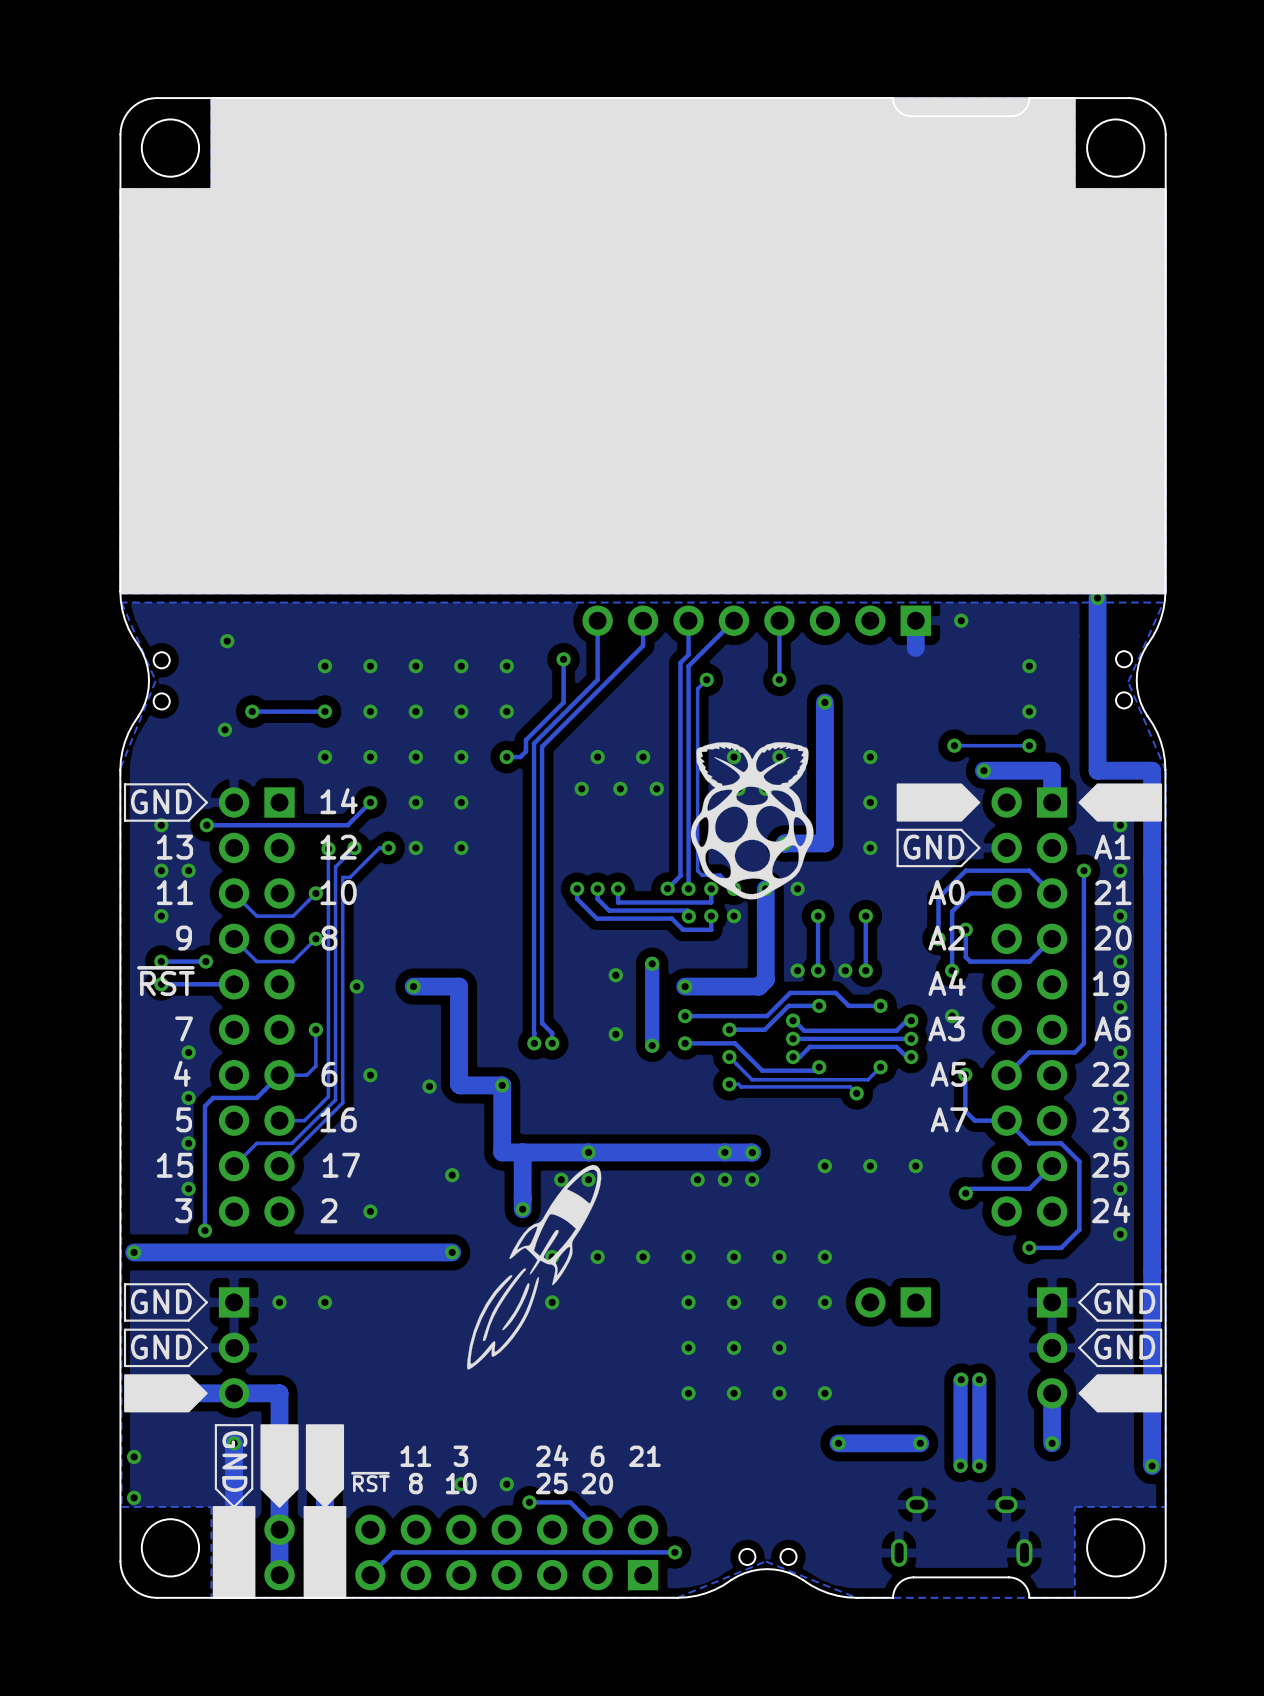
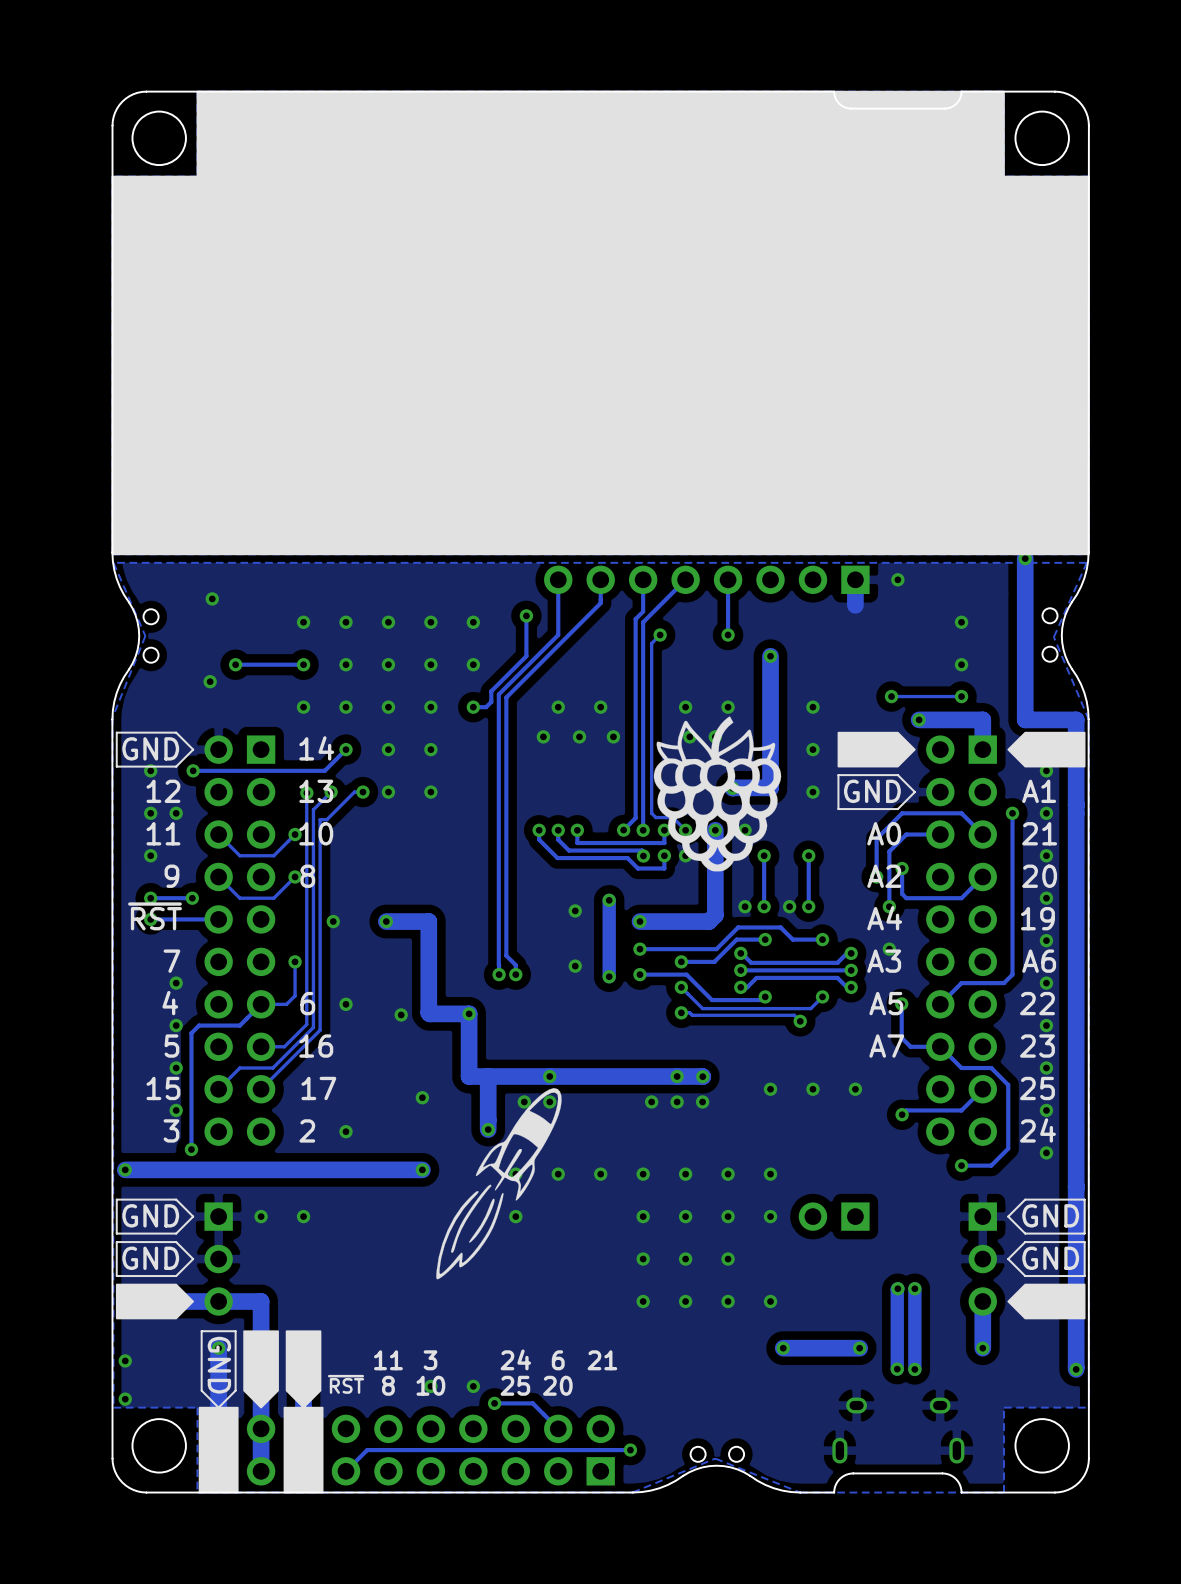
drawing: [690, 742, 814, 900] -> none
drawing: none -> [653, 716, 782, 872]
text: 13 (174, 847) -> 12 (163, 791)
text: 12 (338, 847) -> 13 (316, 791)

